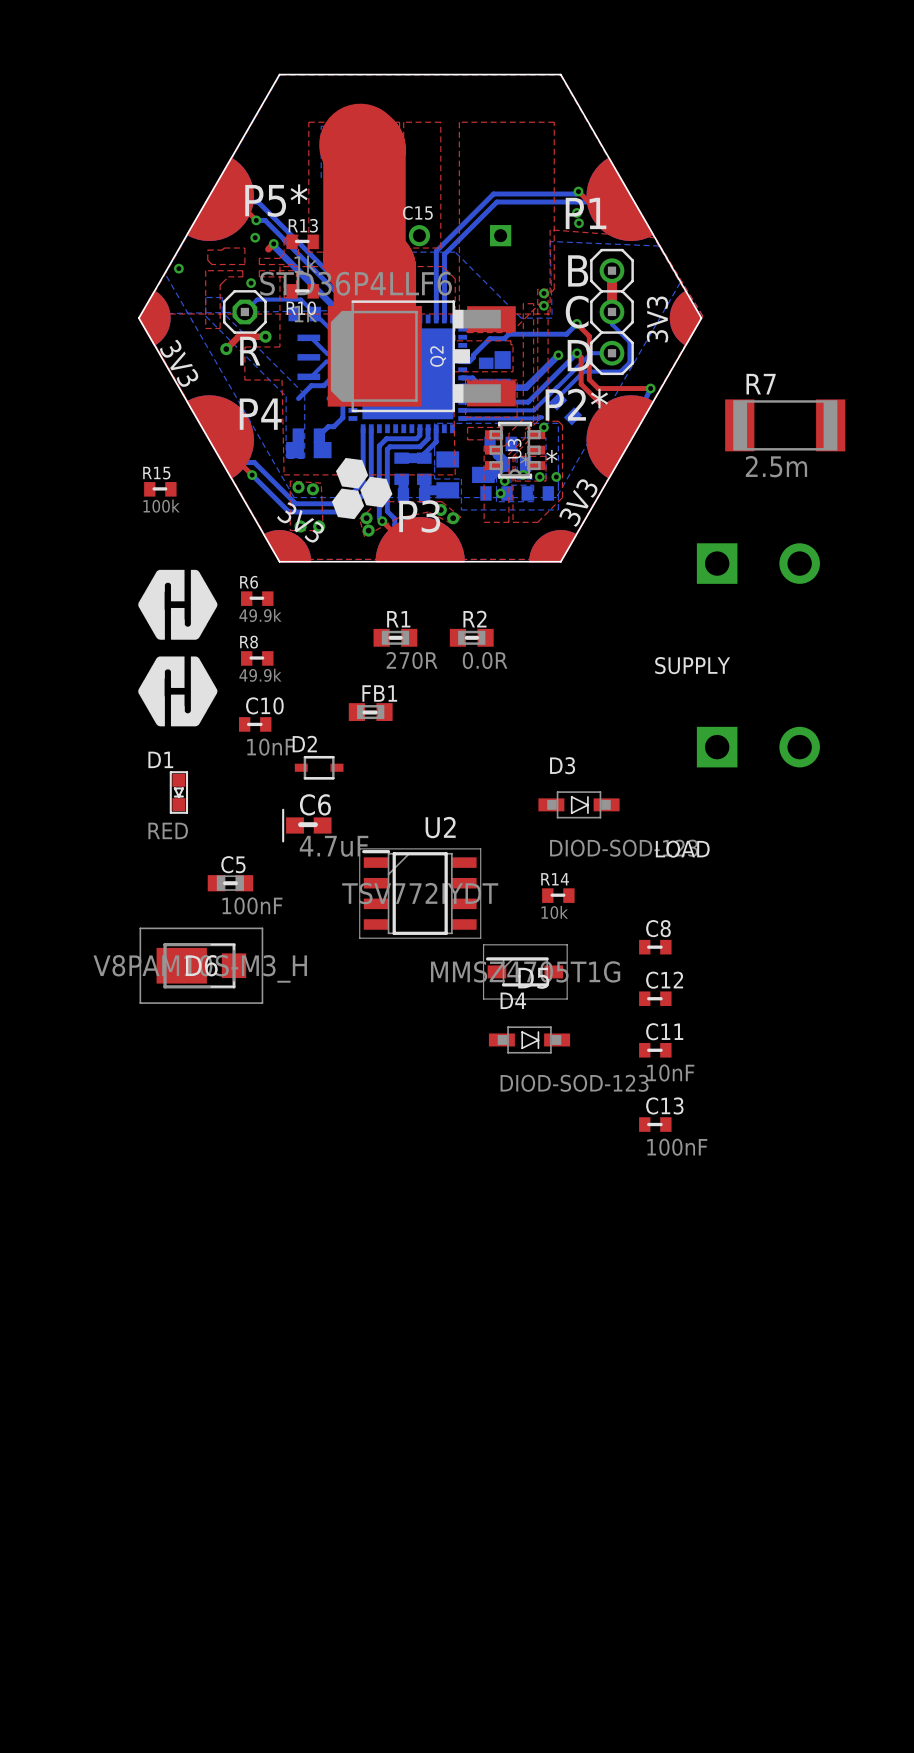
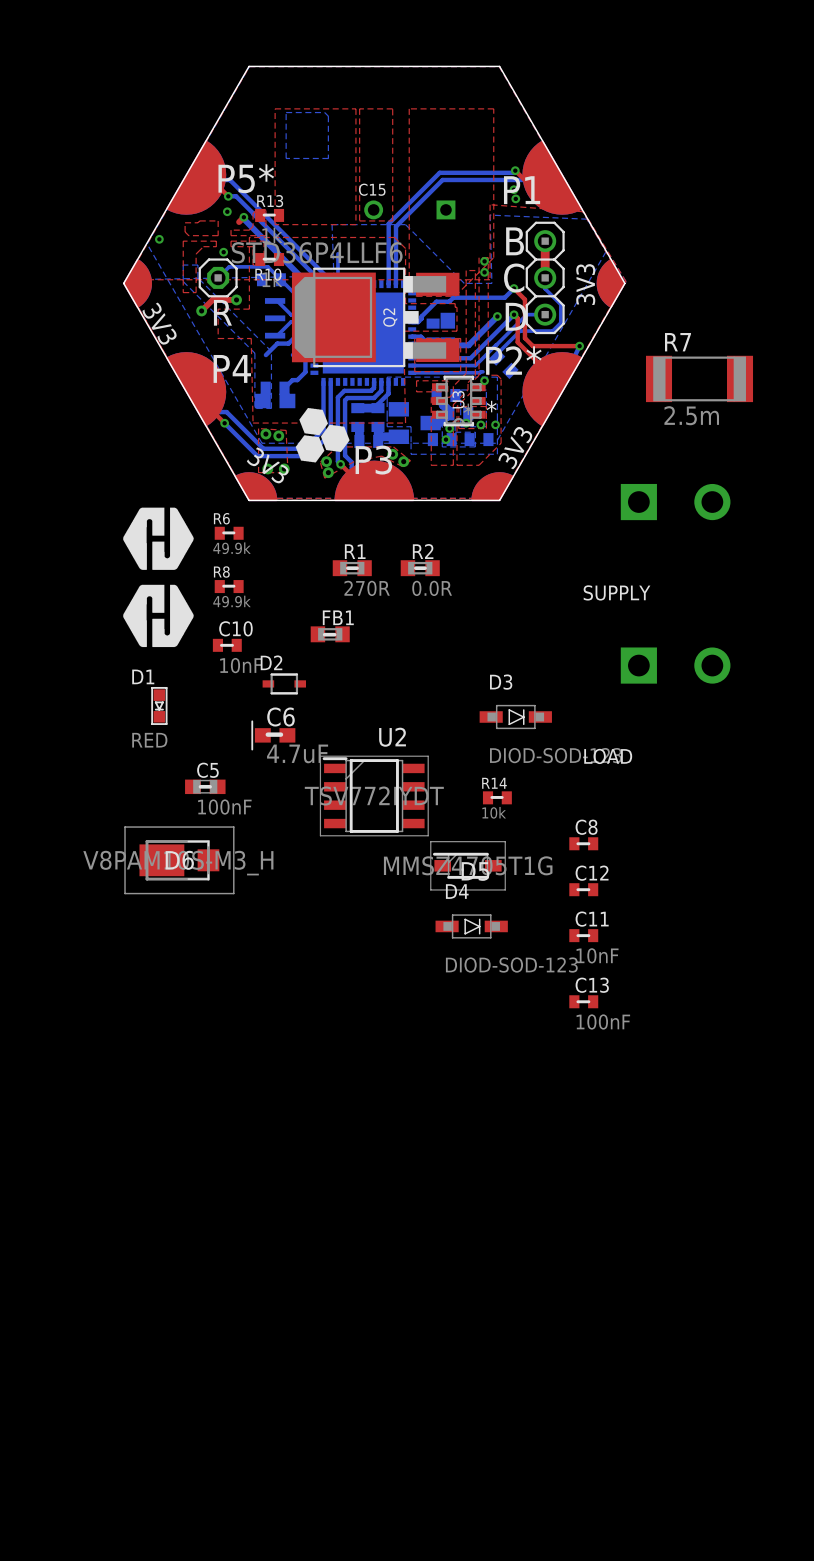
top track: (360, 144) (364, 148) (364, 258) (374, 268) (374, 356) -> none
R15: 100k (160, 489) -> none

